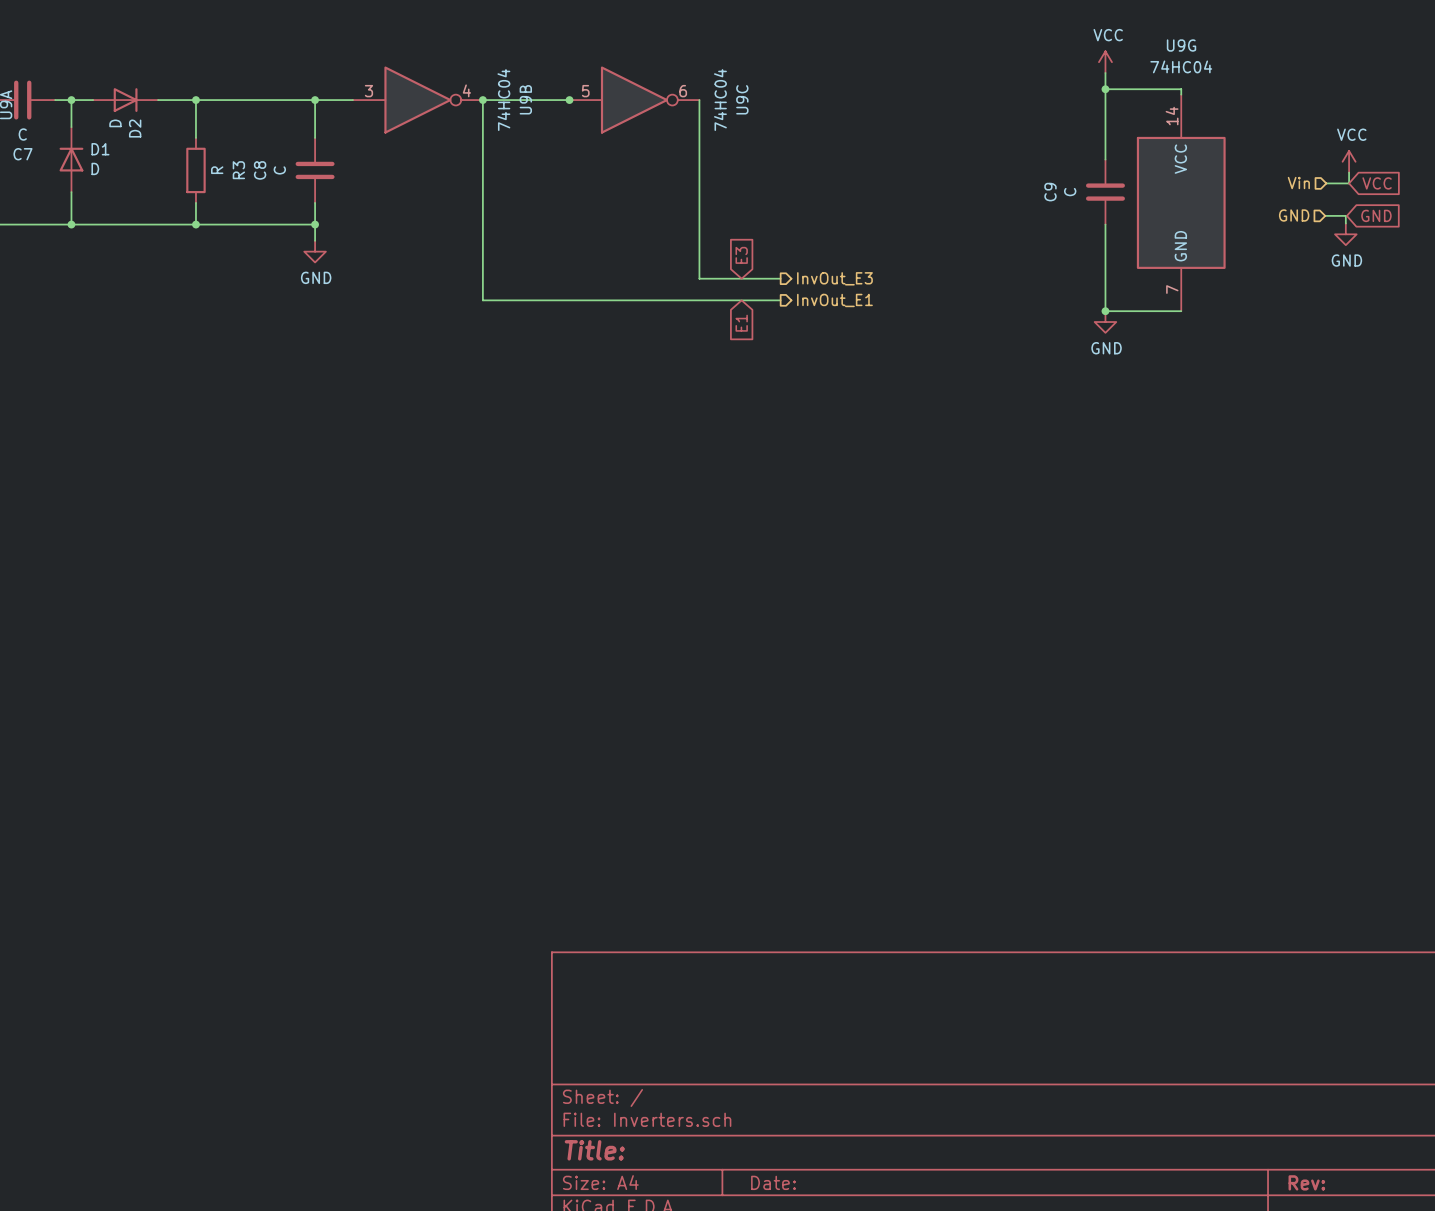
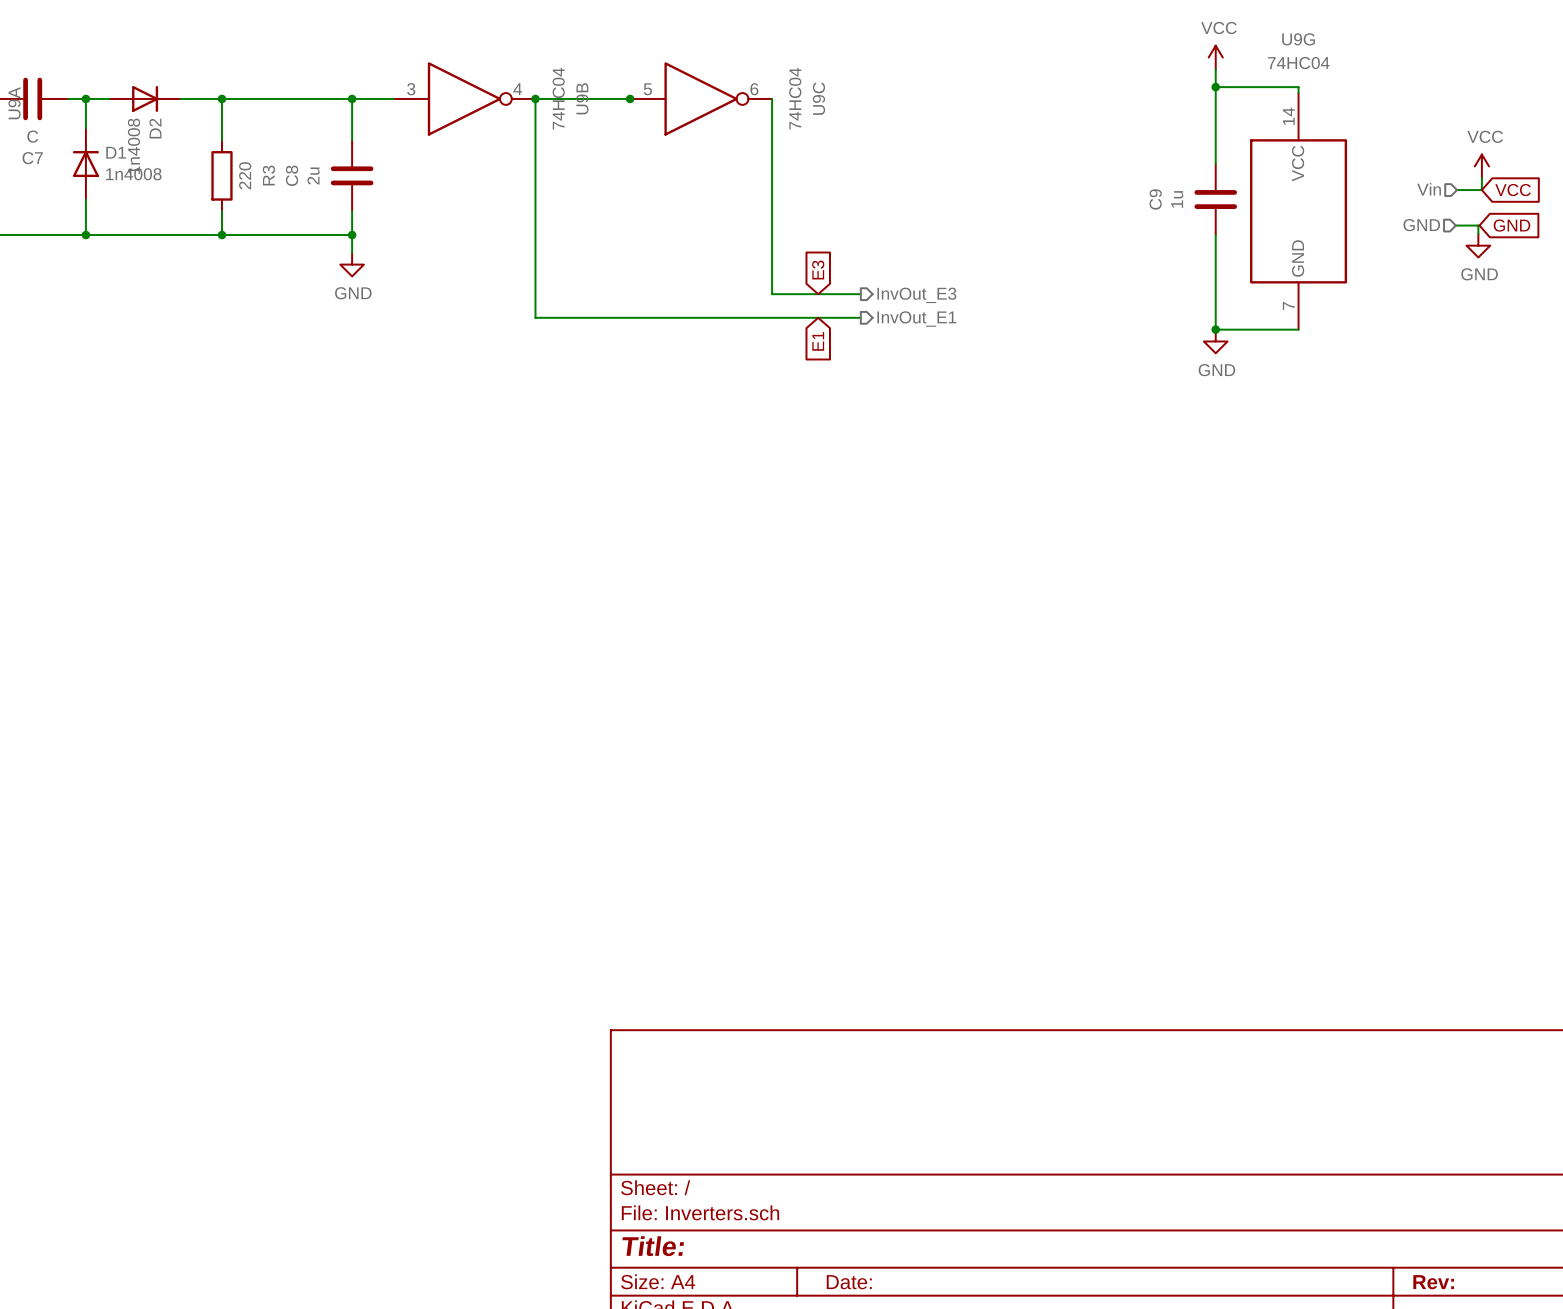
D2 value: D (115, 123) -> 1n4008 (133, 146)
D1 value: D (95, 168) -> 1n4008 (133, 174)
R3 value: R (217, 170) -> 220 (245, 175)
C8 value: C (279, 170) -> 2u (313, 176)
C9 value: C (1070, 192) -> 1u (1177, 199)

